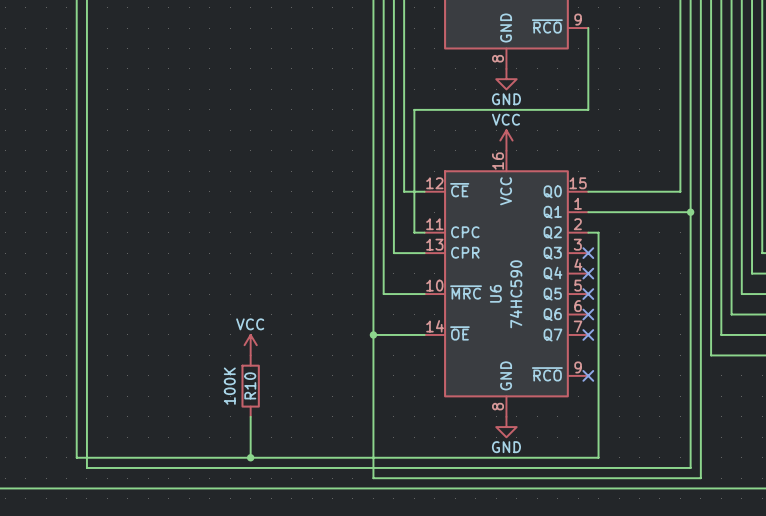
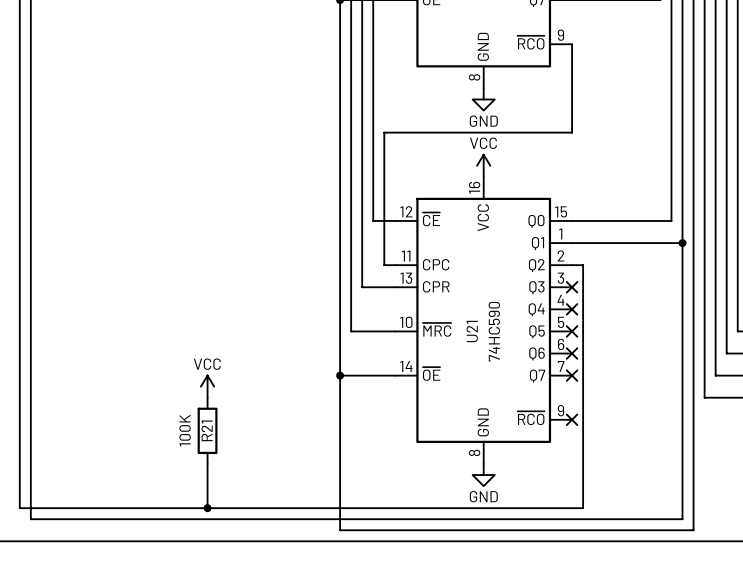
U6 name: U6 (495, 293) -> U21 (472, 331)
R10 name: R10 (250, 385) -> R21 (207, 430)

